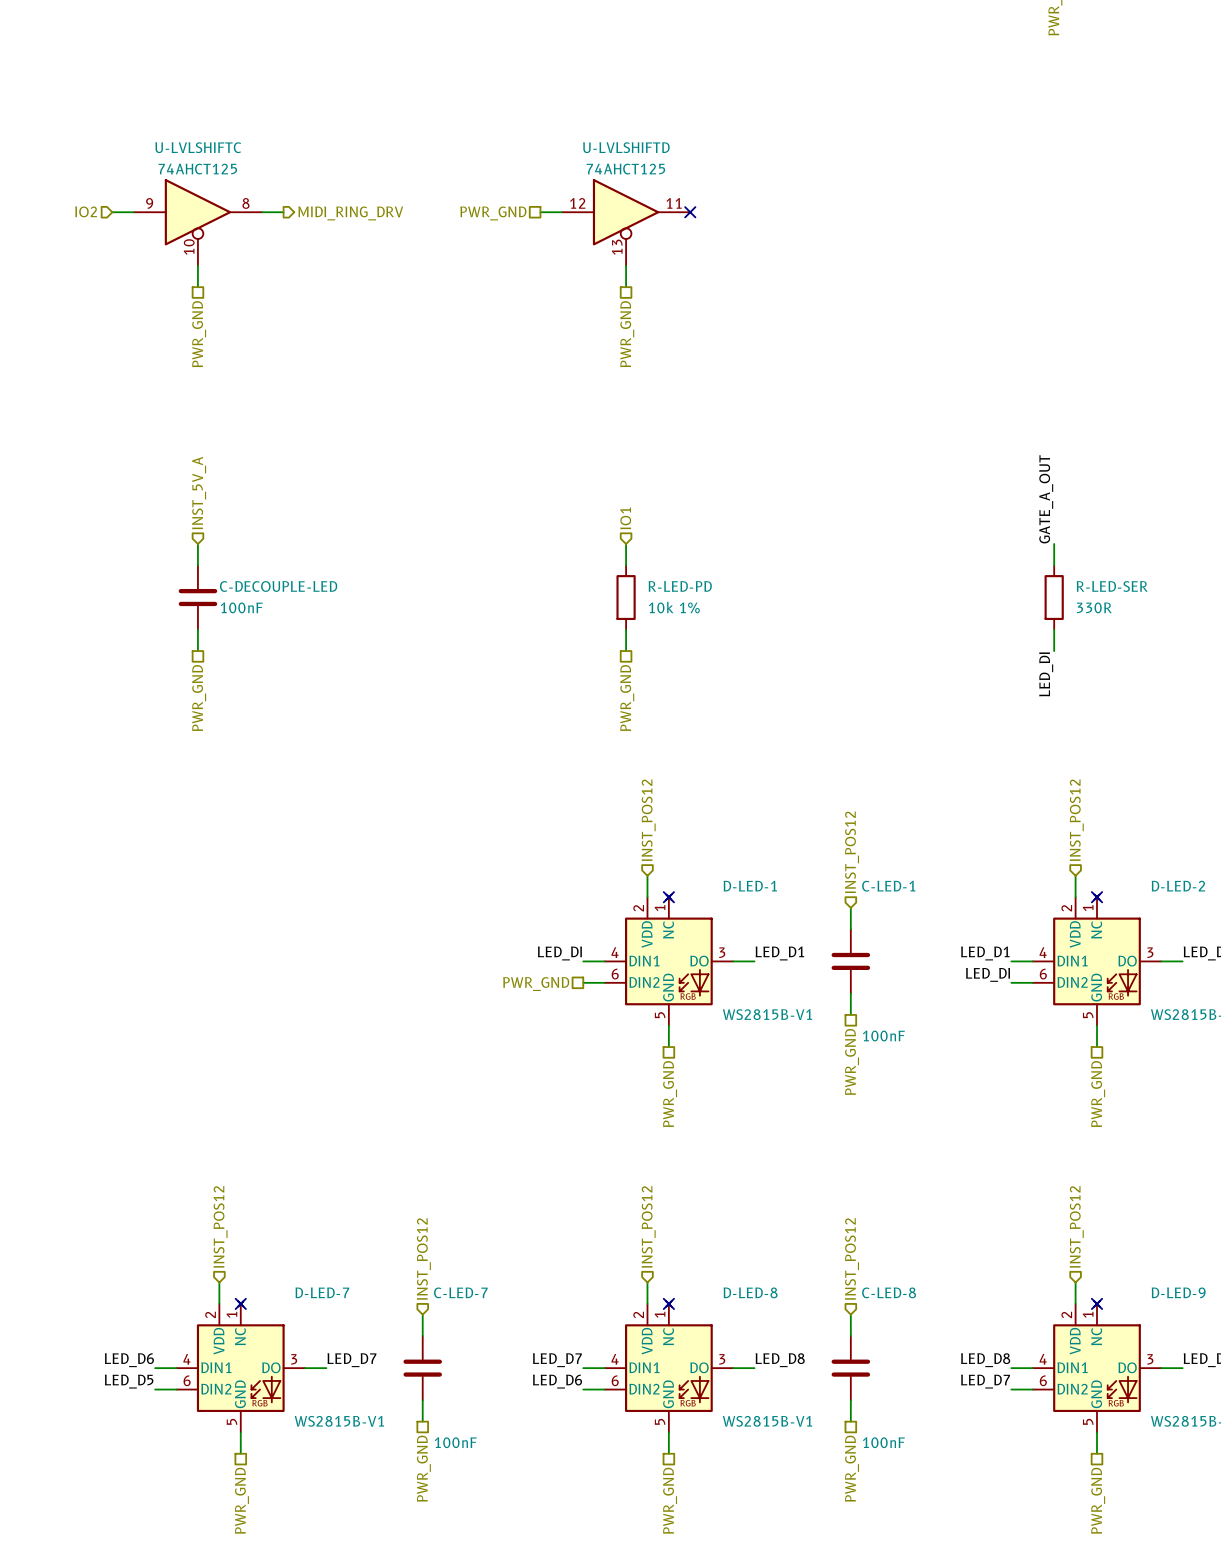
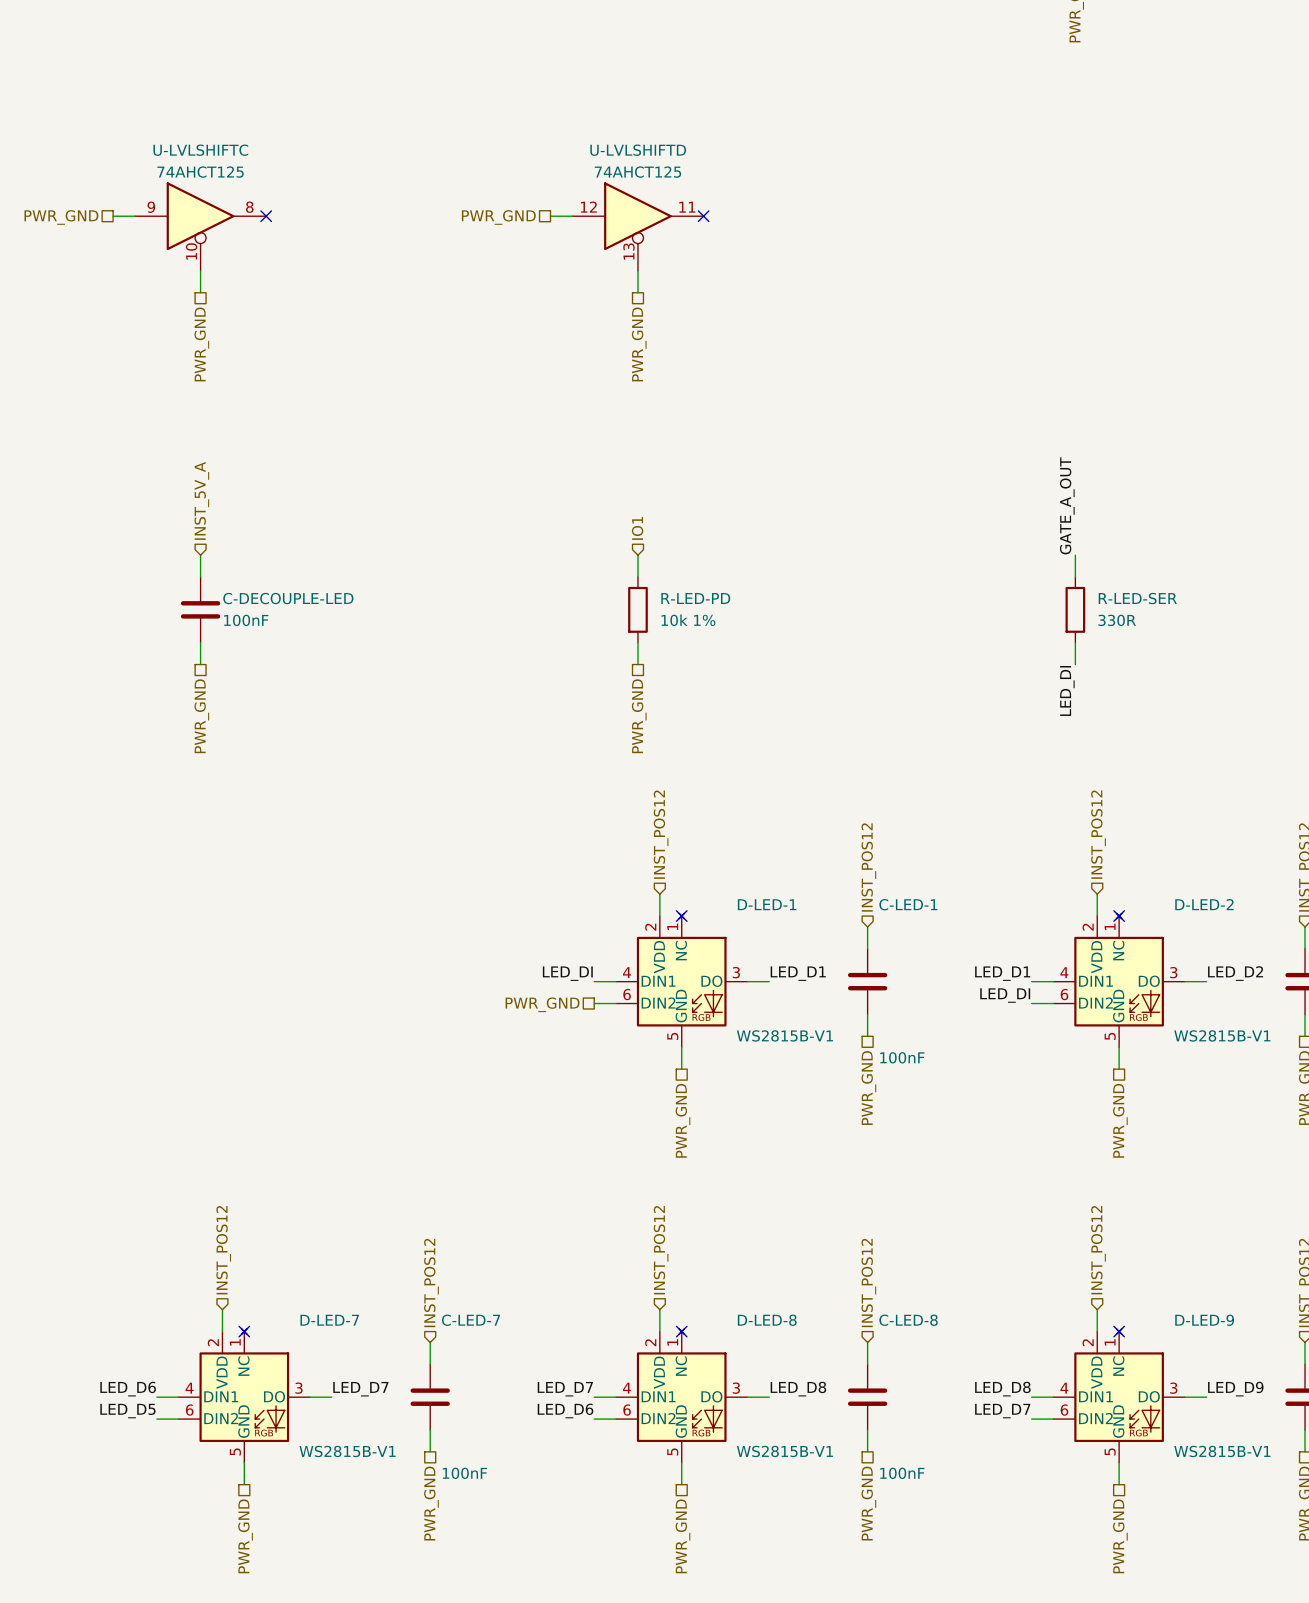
hierarchical label shape: input (86, 211) -> passive (61, 217)
hierarchical label: IO2 (86, 211) -> PWR_GND (61, 217)
wire: (262, 212) (283, 212) -> none
no-connect mark: none -> (266, 216)
hierarchical label: MIDI_RING_DRV (350, 213) -> none

